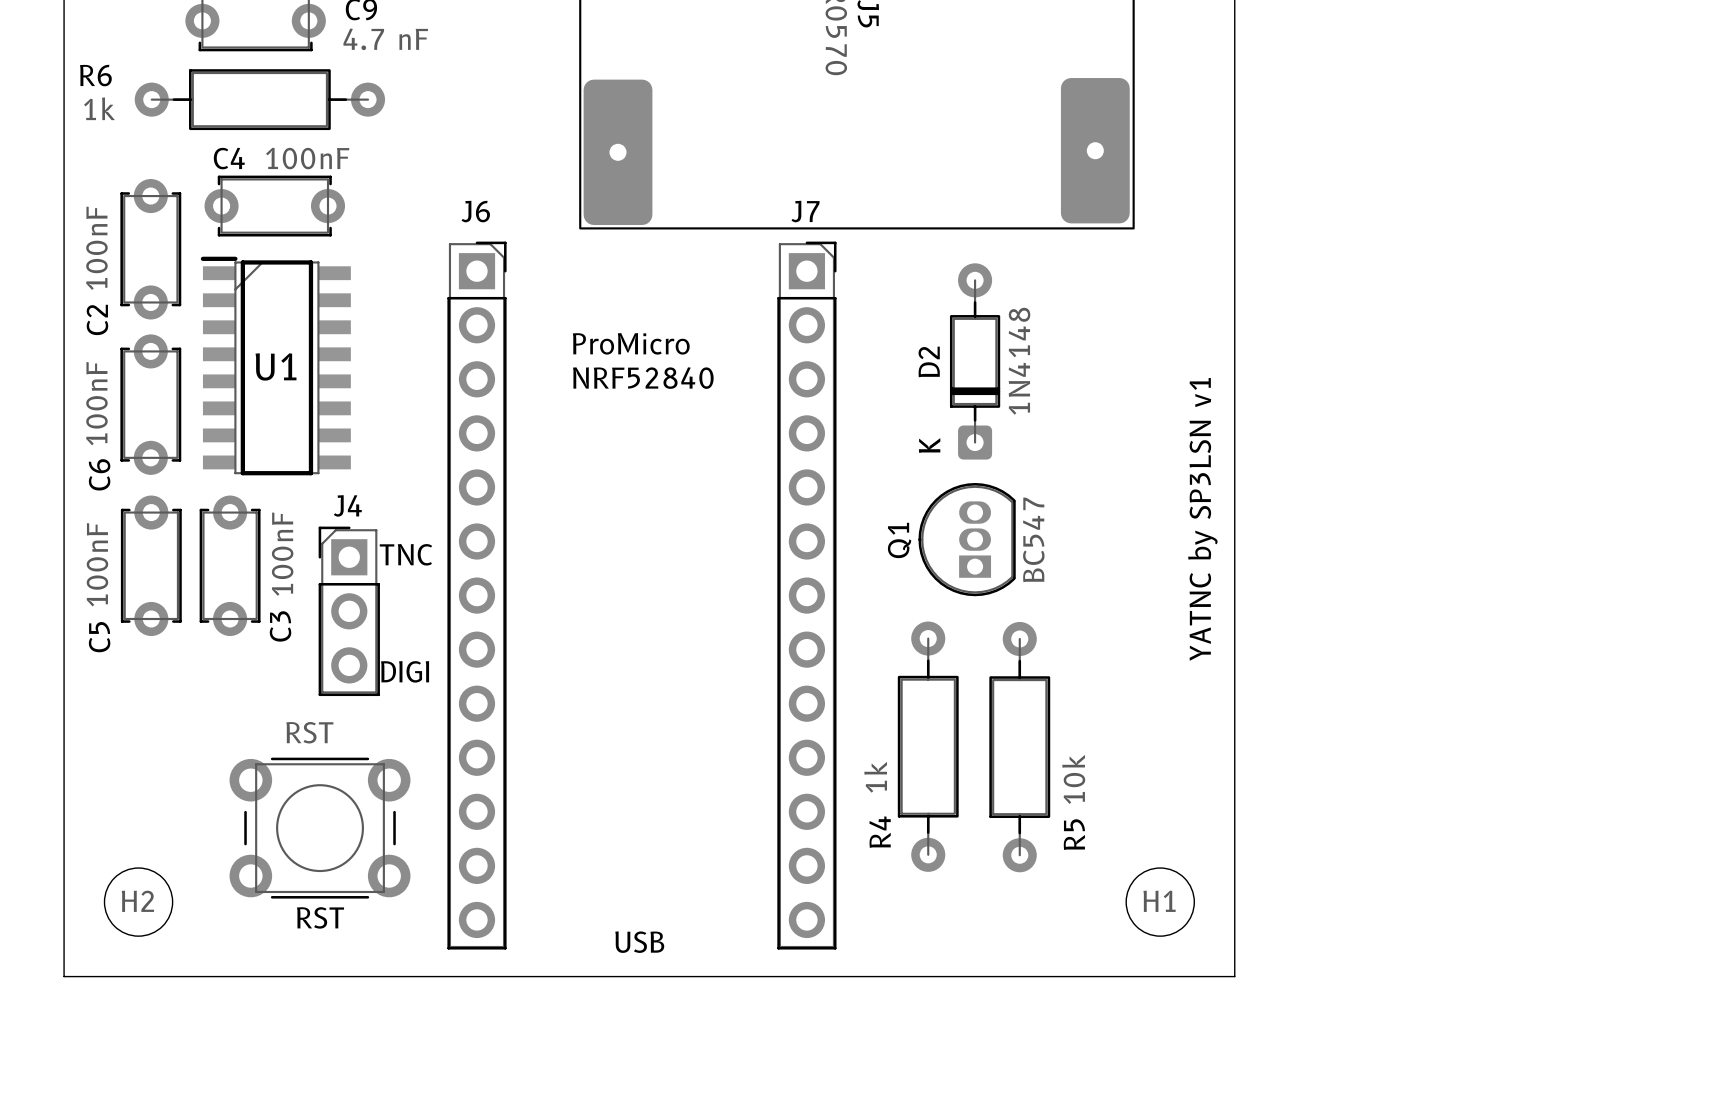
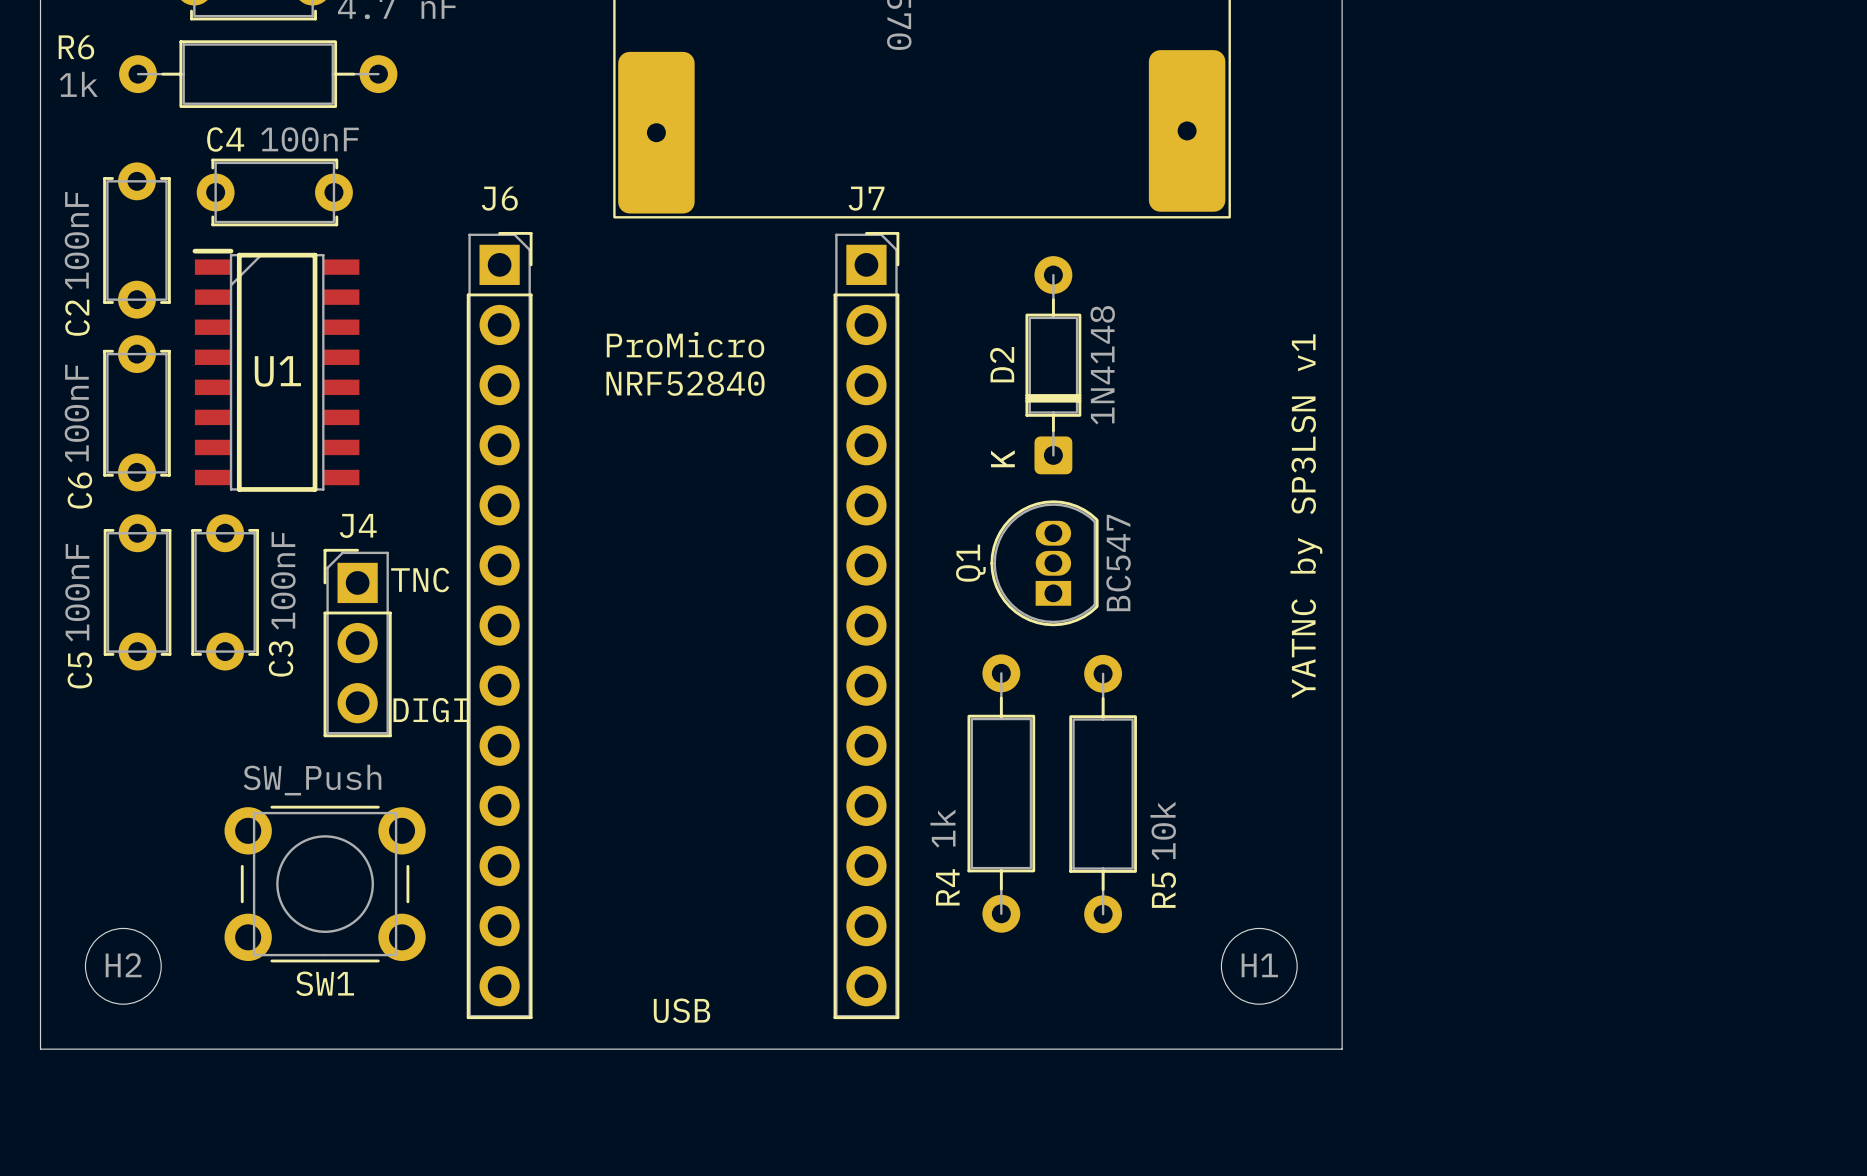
RST value: RST (309, 732) -> SW_Push (312, 780)
RST name: RST (320, 917) -> SW1 (325, 983)

